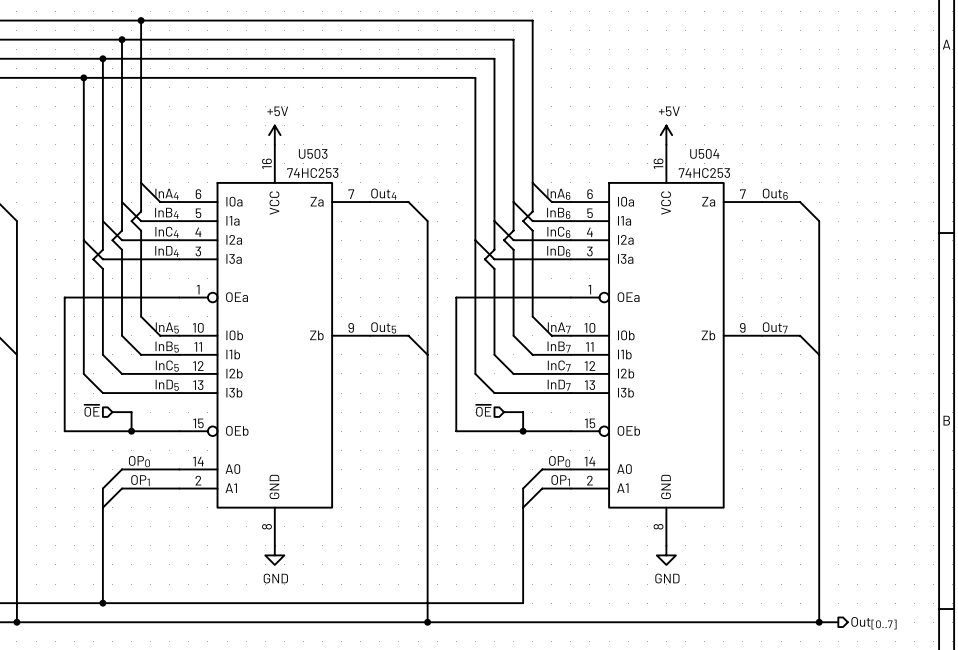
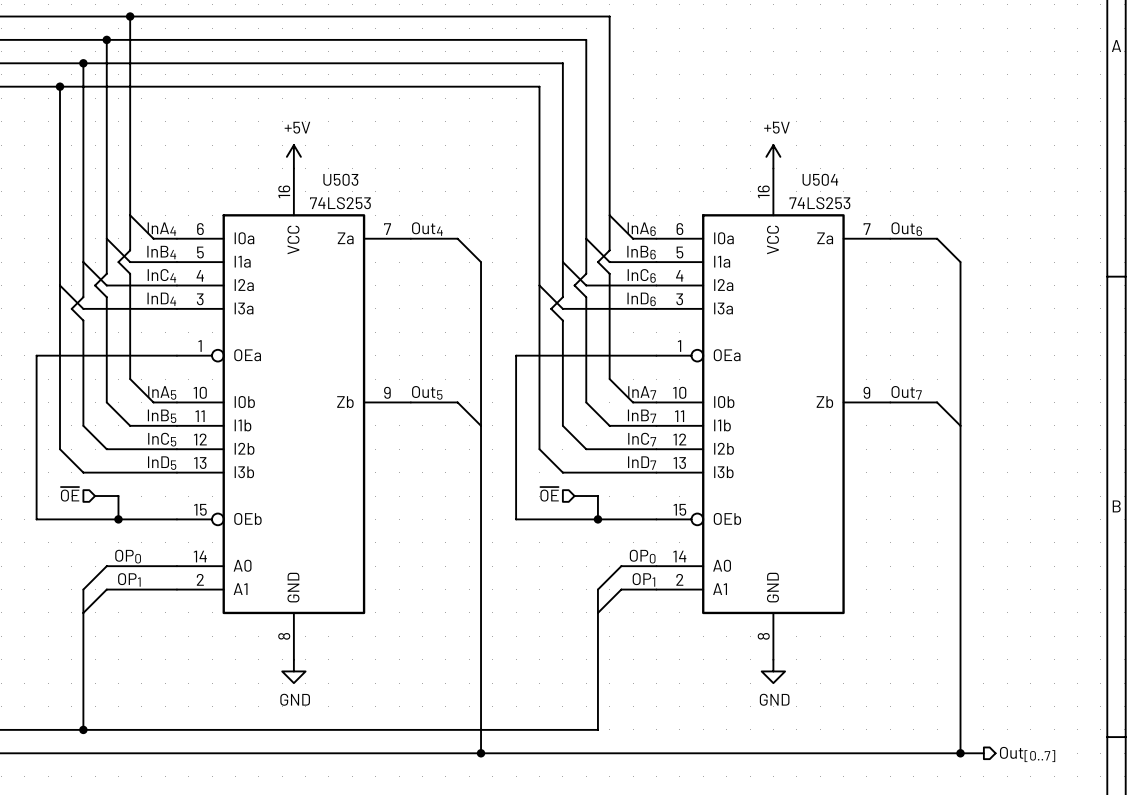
U503 value: 74HC253 (312, 173) -> 74LS253 (340, 203)
U504 value: 74HC253 (704, 173) -> 74LS253 (819, 203)

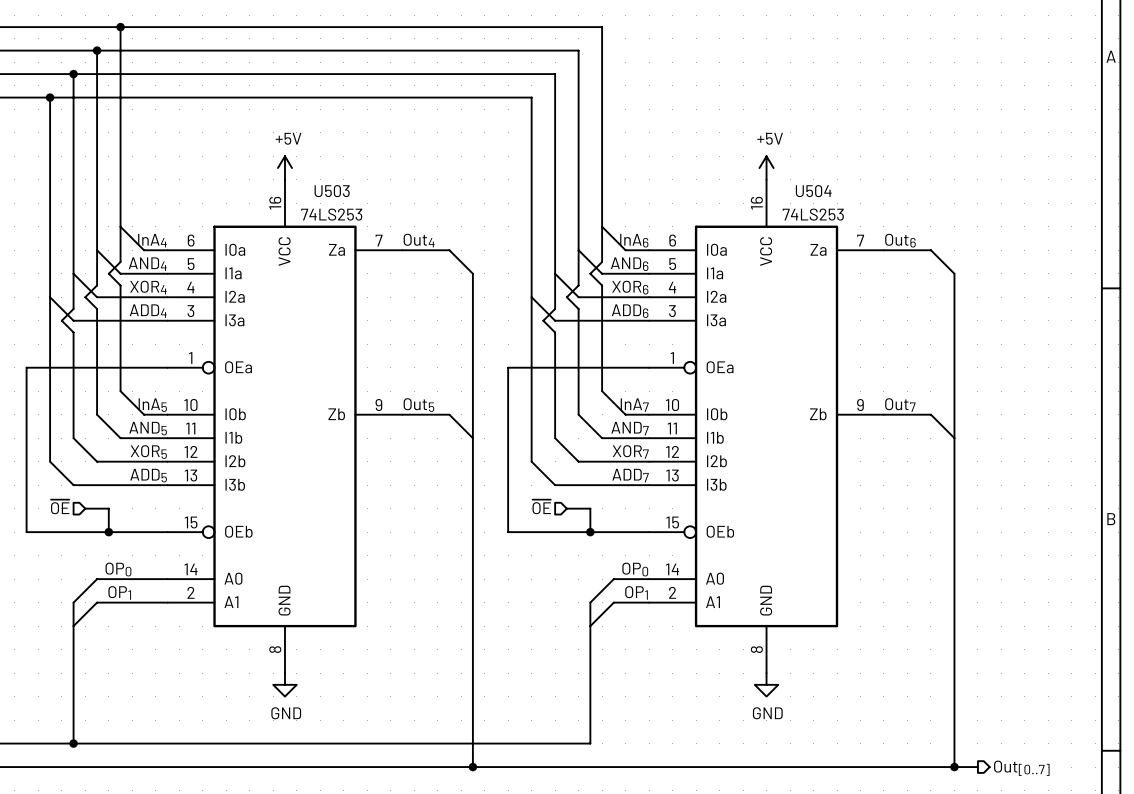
label: InB4 (161, 252) -> AND4 (147, 264)
label: InB6 (641, 252) -> AND6 (629, 264)
label: InC4 (161, 275) -> XOR4 (148, 287)
label: InC6 (641, 275) -> XOR6 (630, 287)
label: InD4 (161, 299) -> ADD4 (148, 311)
label: InD6 (641, 299) -> ADD6 (630, 311)
label: InB5 (162, 416) -> AND5 (148, 428)
label: InB7 (642, 416) -> AND7 (630, 428)
label: InC5 (162, 439) -> XOR5 (148, 452)
label: InC7 (642, 439) -> XOR7 (630, 452)
label: InD5 (162, 463) -> ADD5 (148, 475)
label: InD7 (642, 463) -> ADD7 (630, 475)

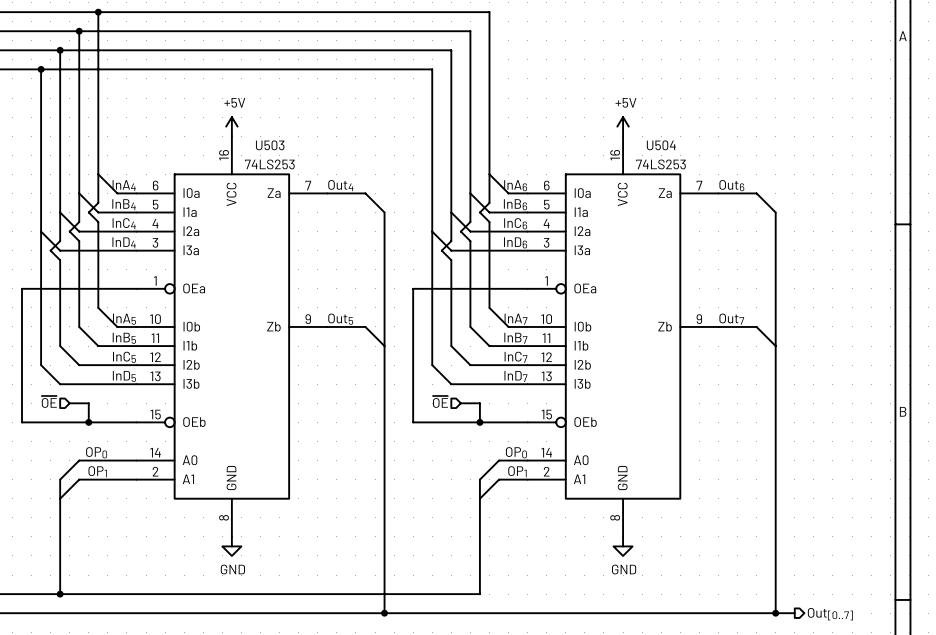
label: AND4 (147, 264) -> InB4 (124, 204)
label: AND6 (629, 264) -> InB6 (515, 204)
label: XOR4 (148, 287) -> InC4 (124, 223)
label: XOR6 (630, 287) -> InC6 (515, 223)
label: ADD4 (148, 311) -> InD4 (124, 242)
label: ADD6 (630, 311) -> InD6 (515, 242)
label: AND5 (148, 428) -> InB5 (124, 338)
label: AND7 (630, 428) -> InB7 (515, 338)
label: XOR5 (148, 452) -> InC5 (124, 357)
label: XOR7 (630, 452) -> InC7 (516, 357)
label: ADD5 (148, 475) -> InD5 (124, 376)
label: ADD7 (630, 475) -> InD7 (515, 376)

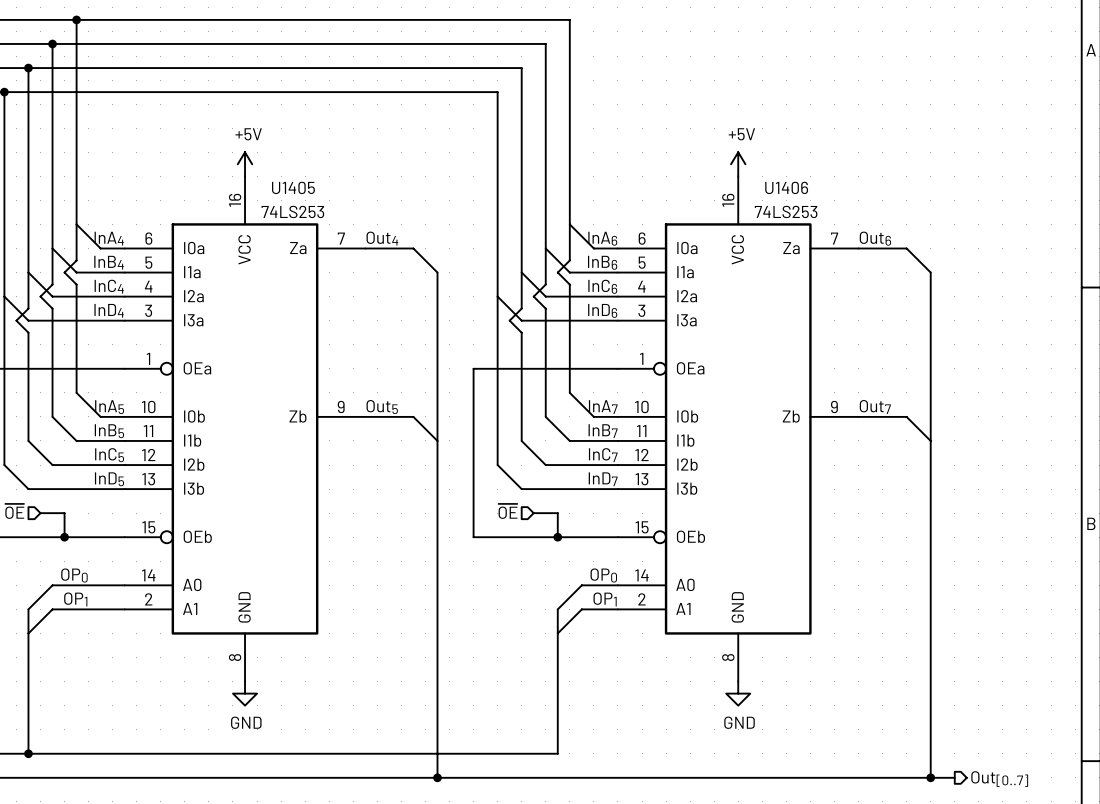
U503 name: U503 (270, 145) -> U1405 (293, 187)
U504 name: U504 (661, 145) -> U1406 (786, 187)

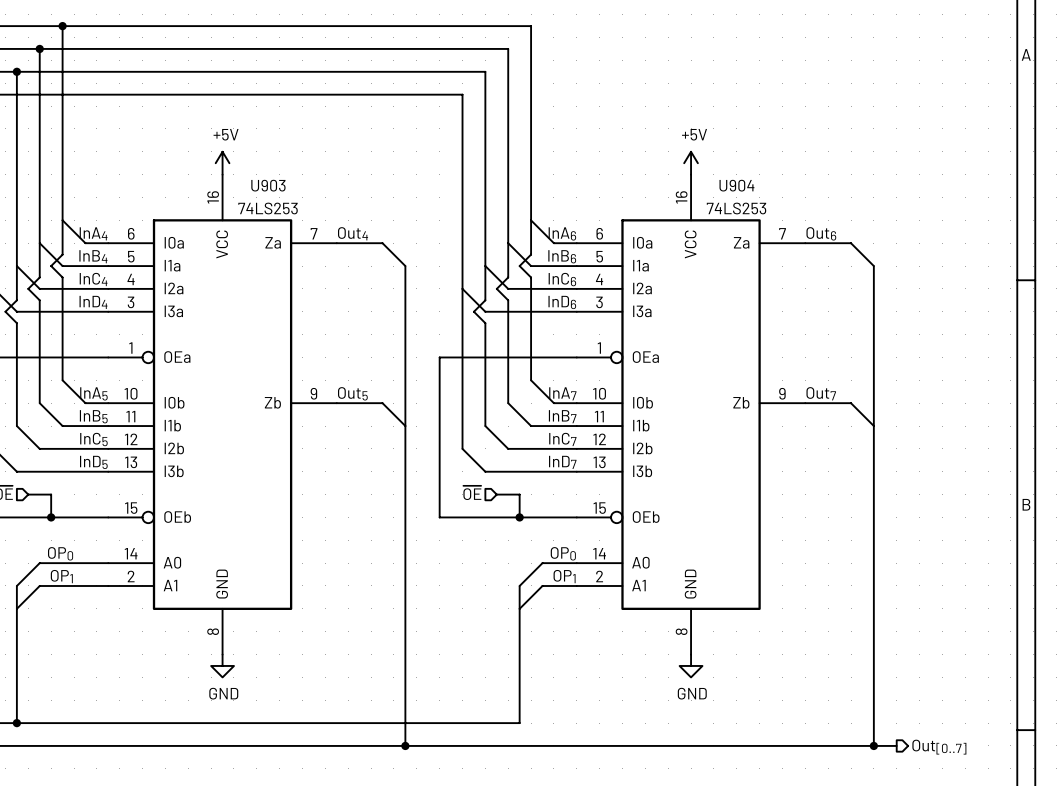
U1405 name: U1405 (293, 187) -> U903 (268, 185)
U1406 name: U1406 (786, 187) -> U904 (736, 185)

